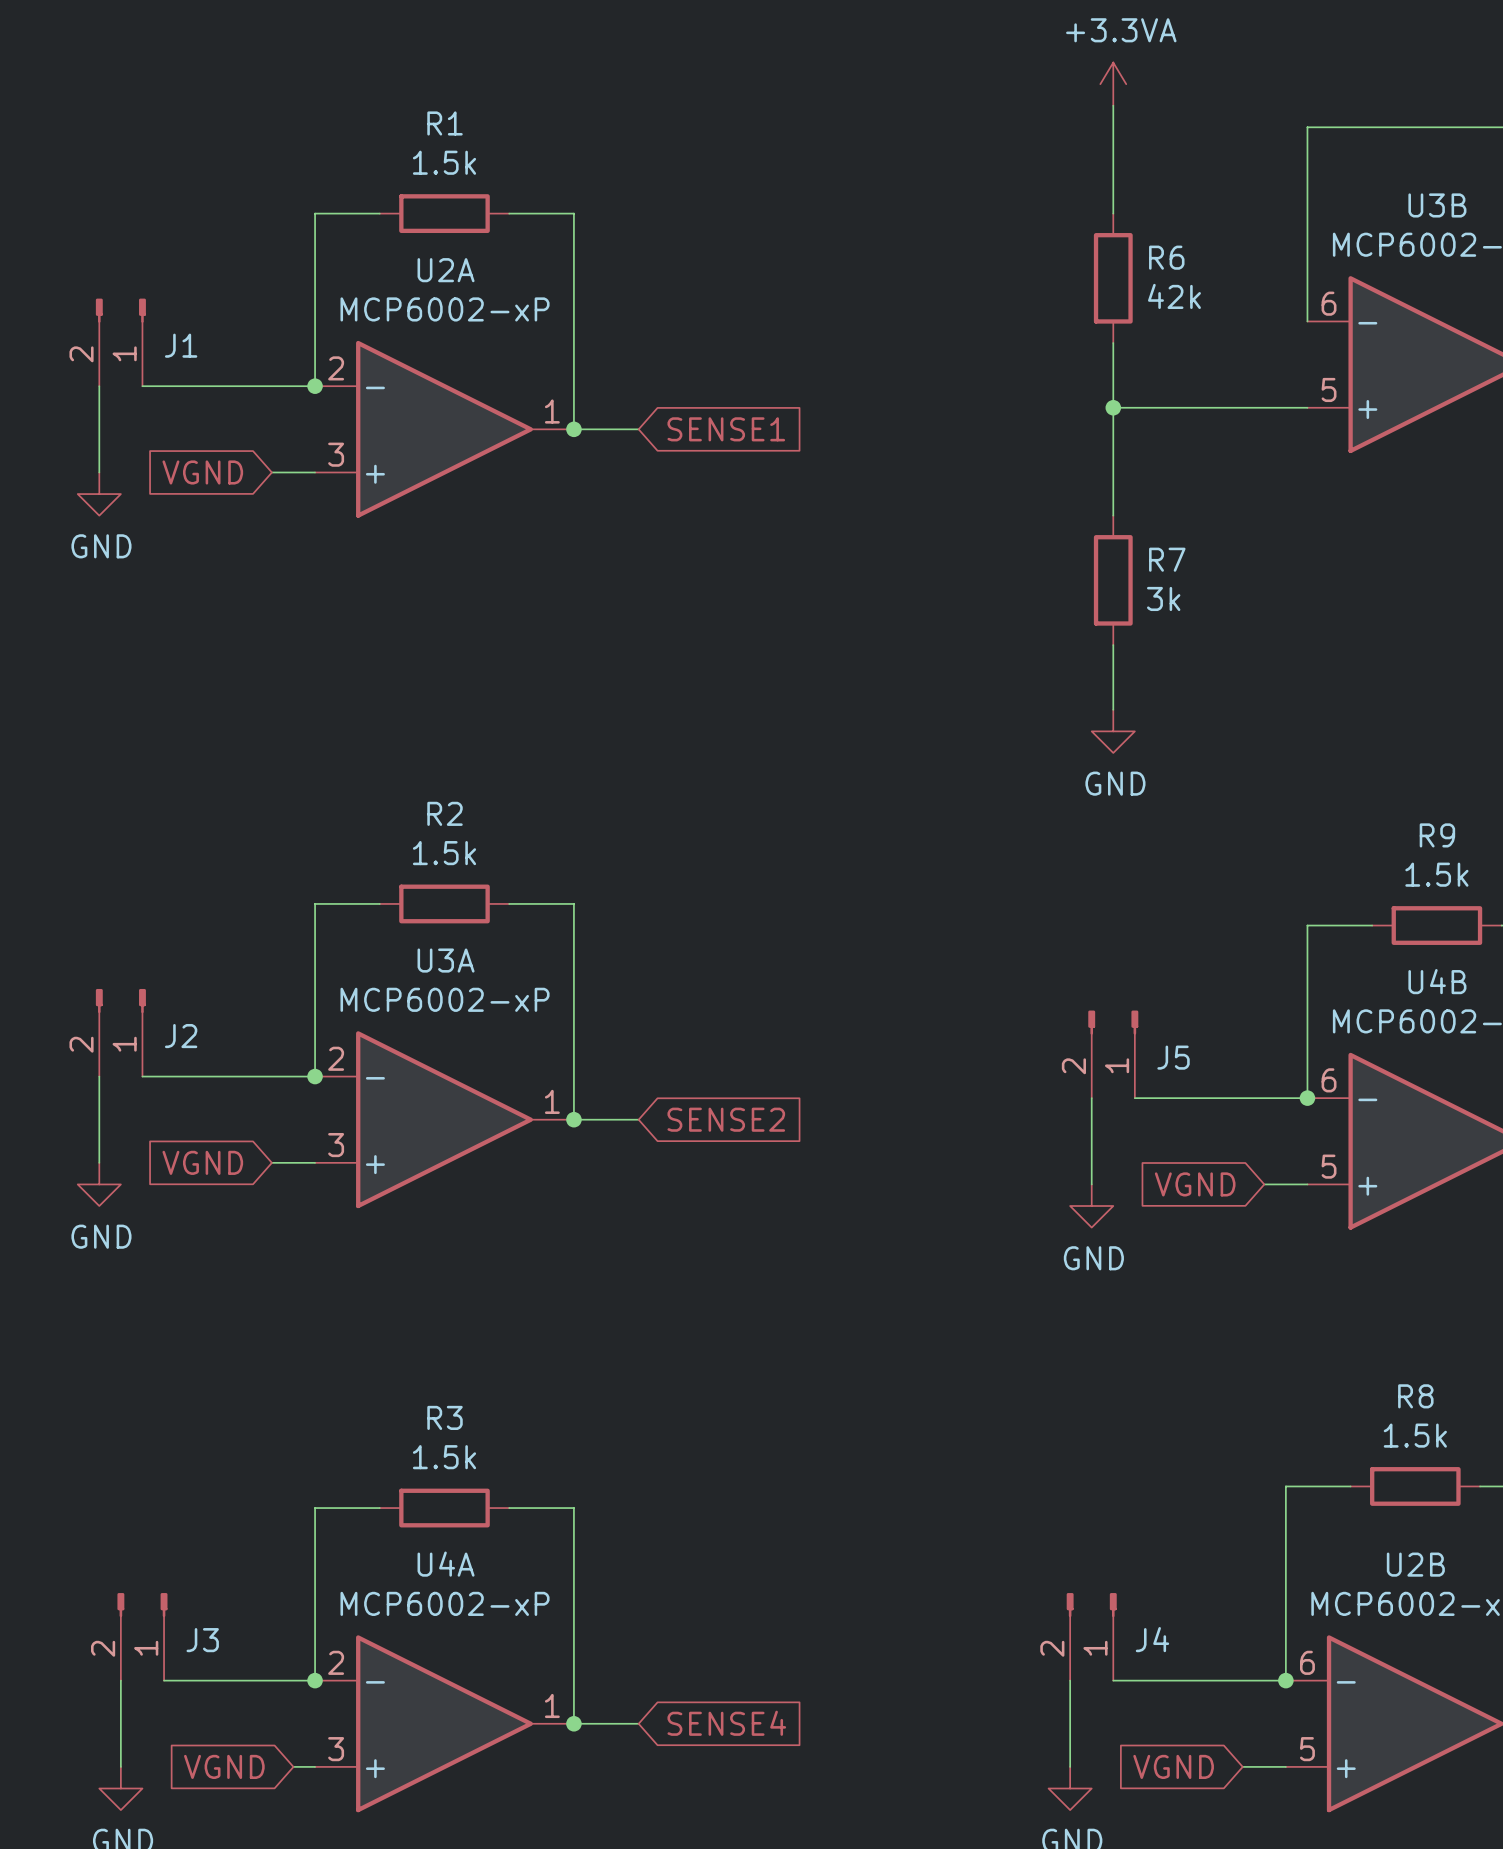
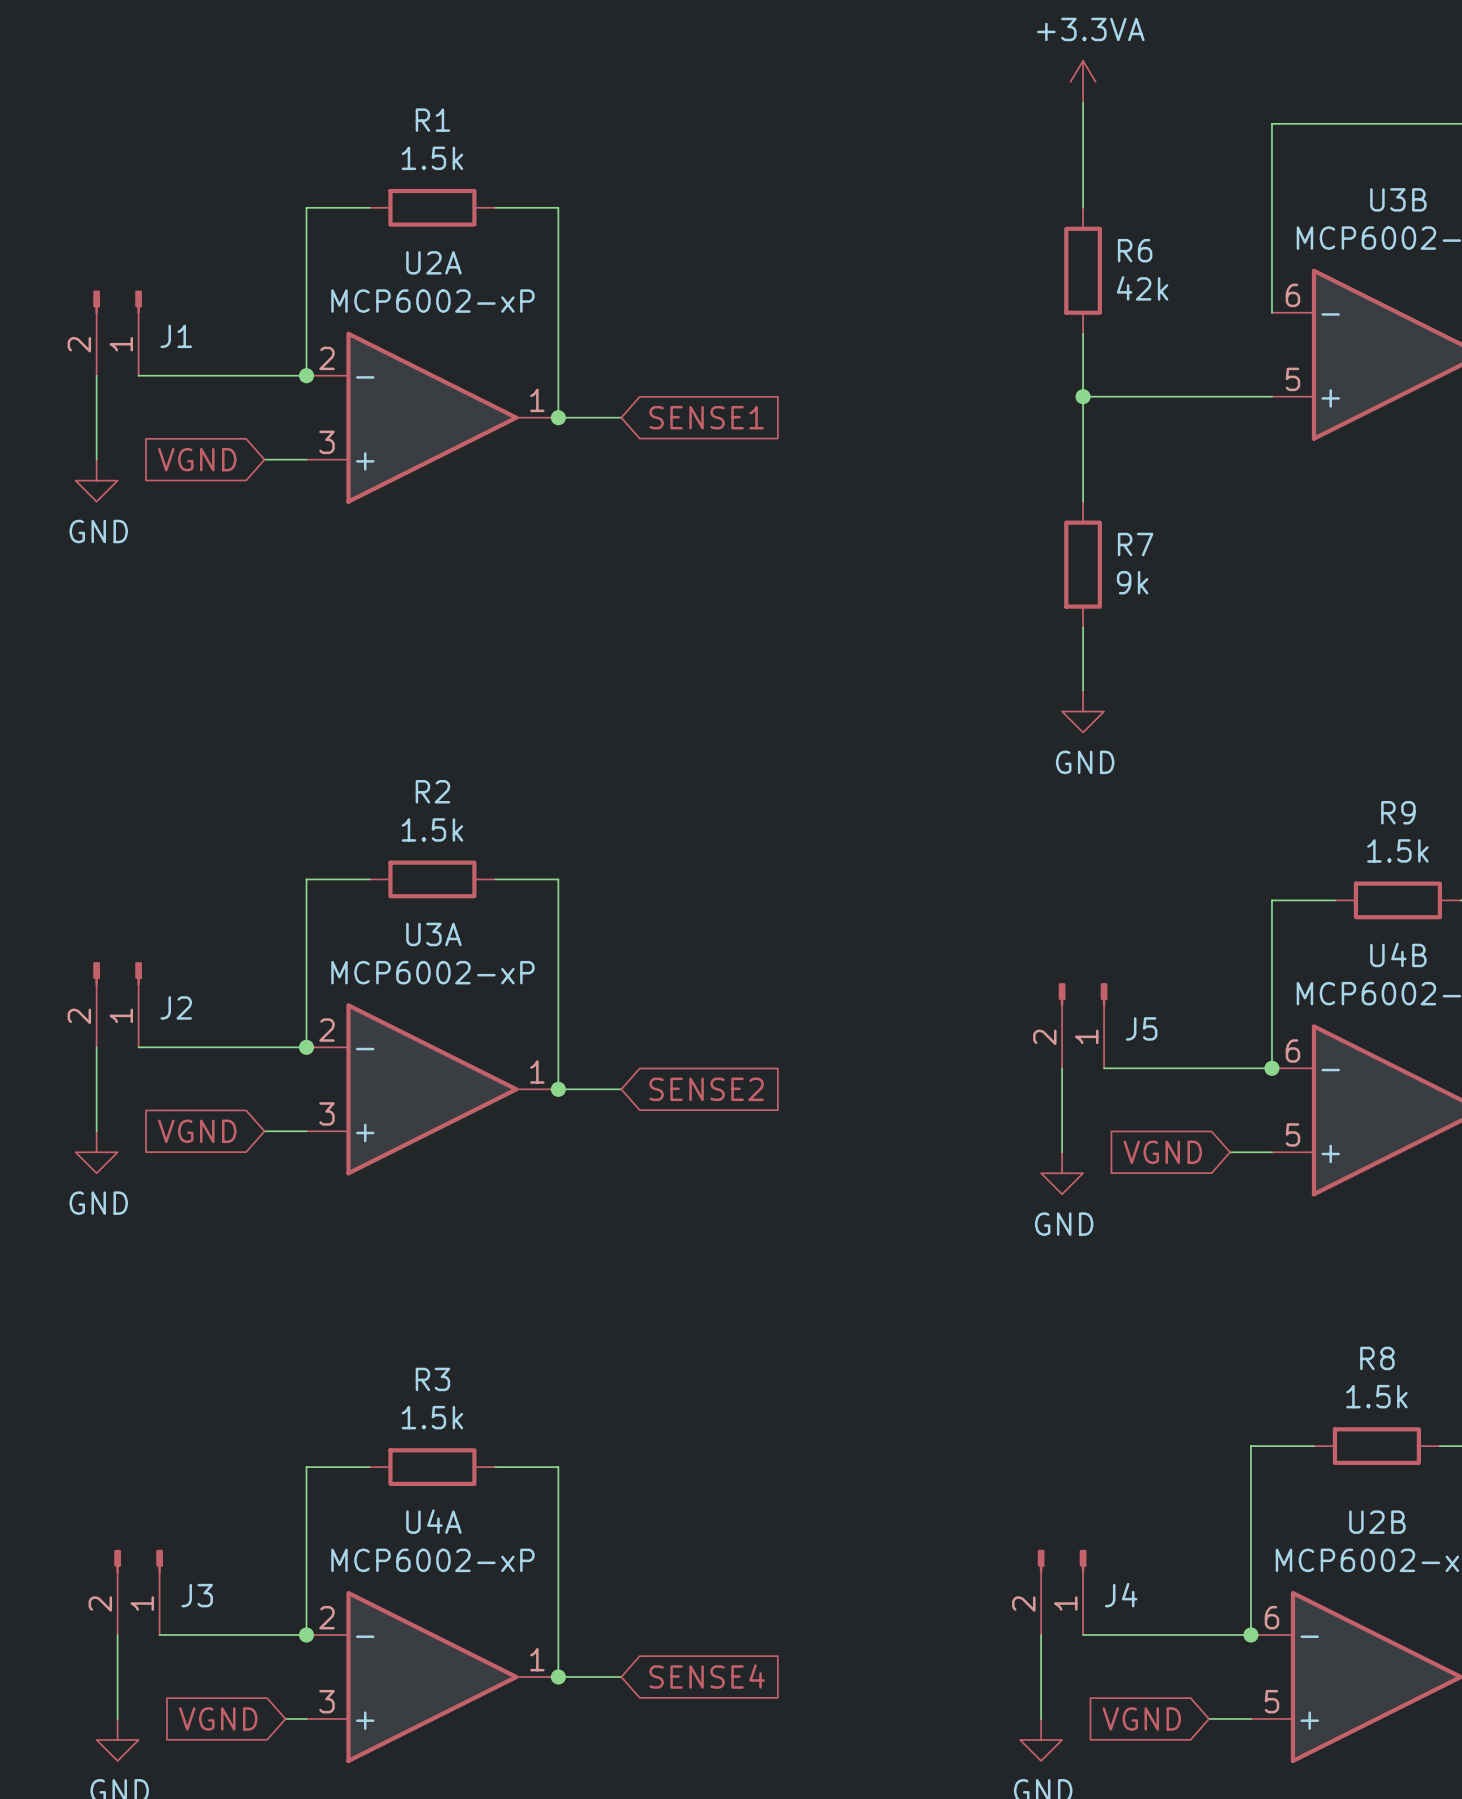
R7 value: 3k (1163, 598) -> 9k (1132, 582)

